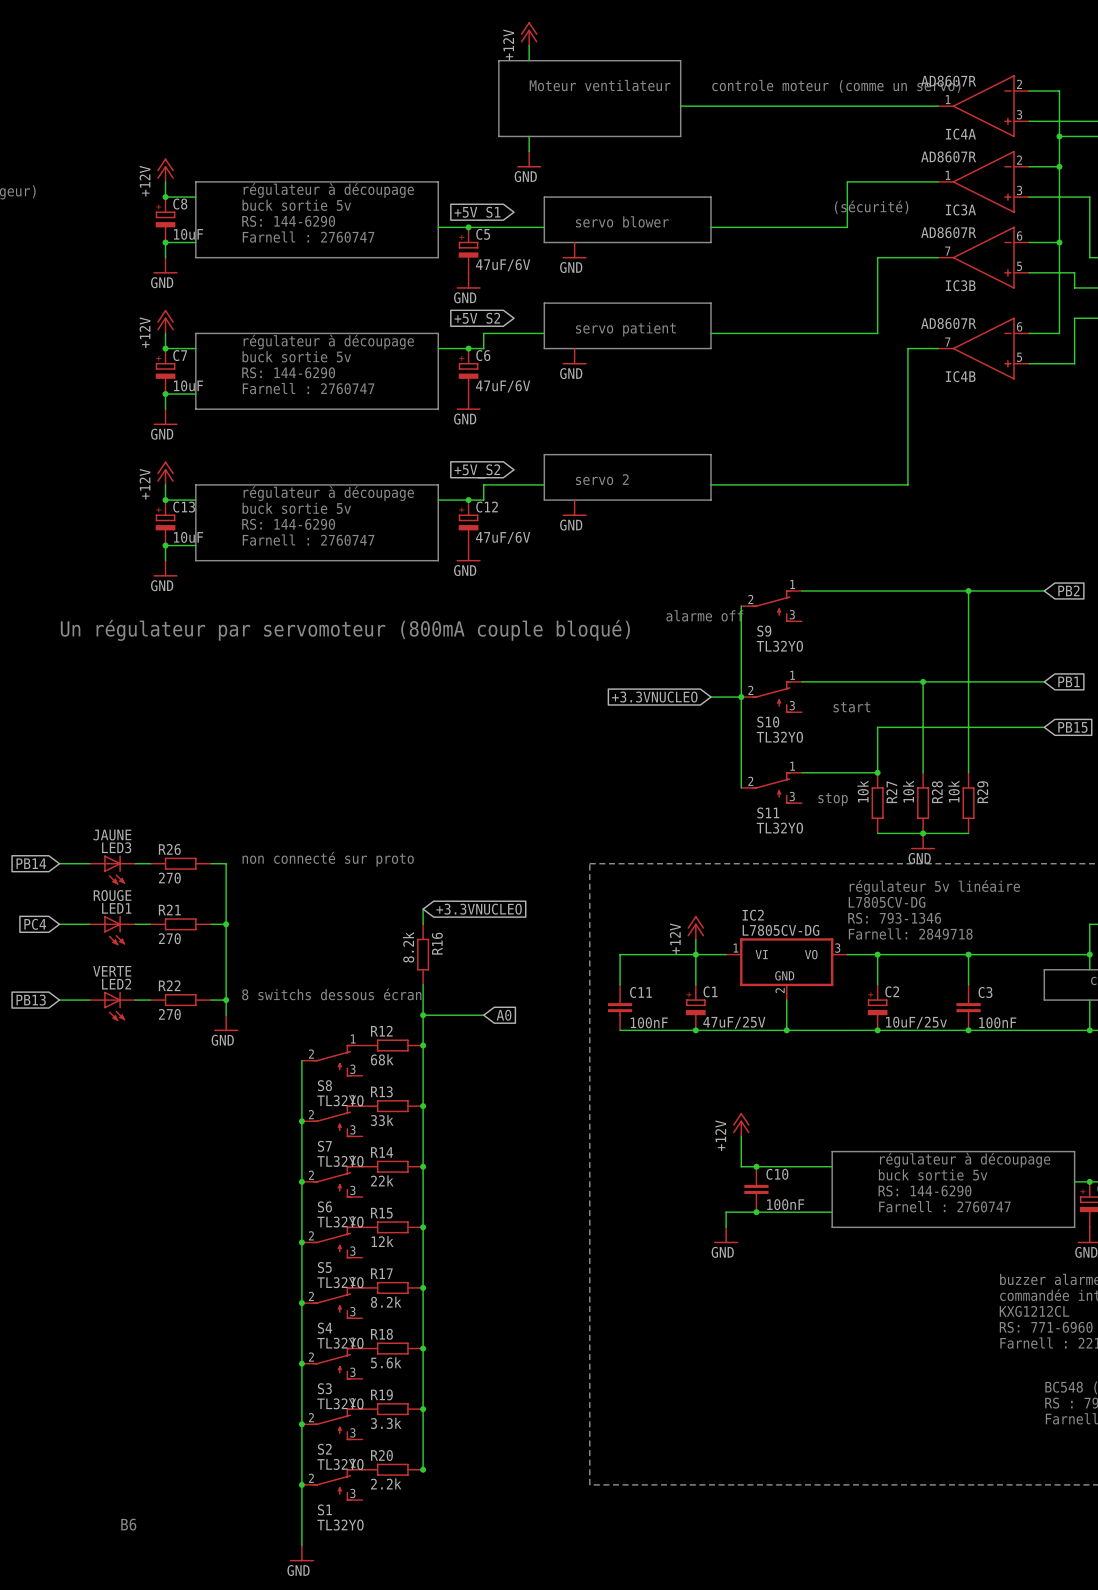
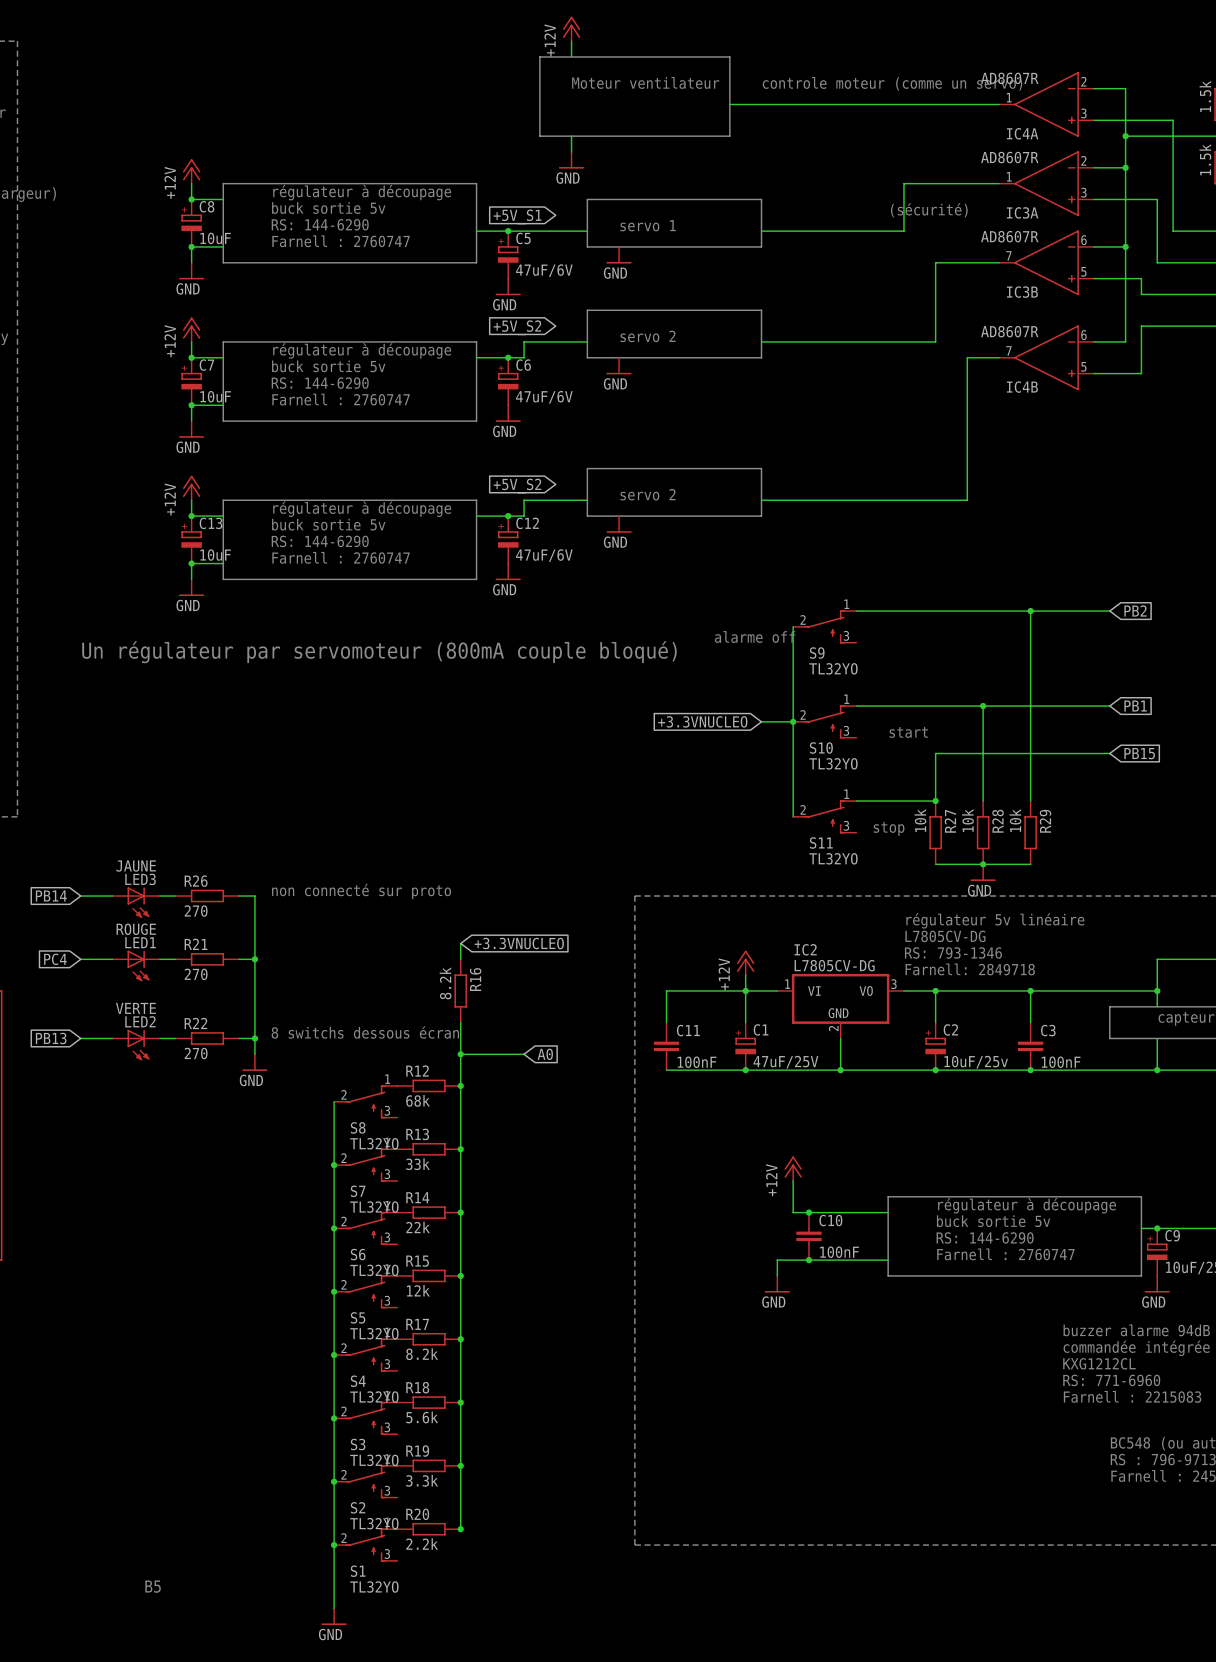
text: servo blower (622, 221) -> servo 1 (648, 225)
text: servo patient (625, 329) -> servo 2 (647, 336)
text: B6 (128, 1524) -> B5 (153, 1586)

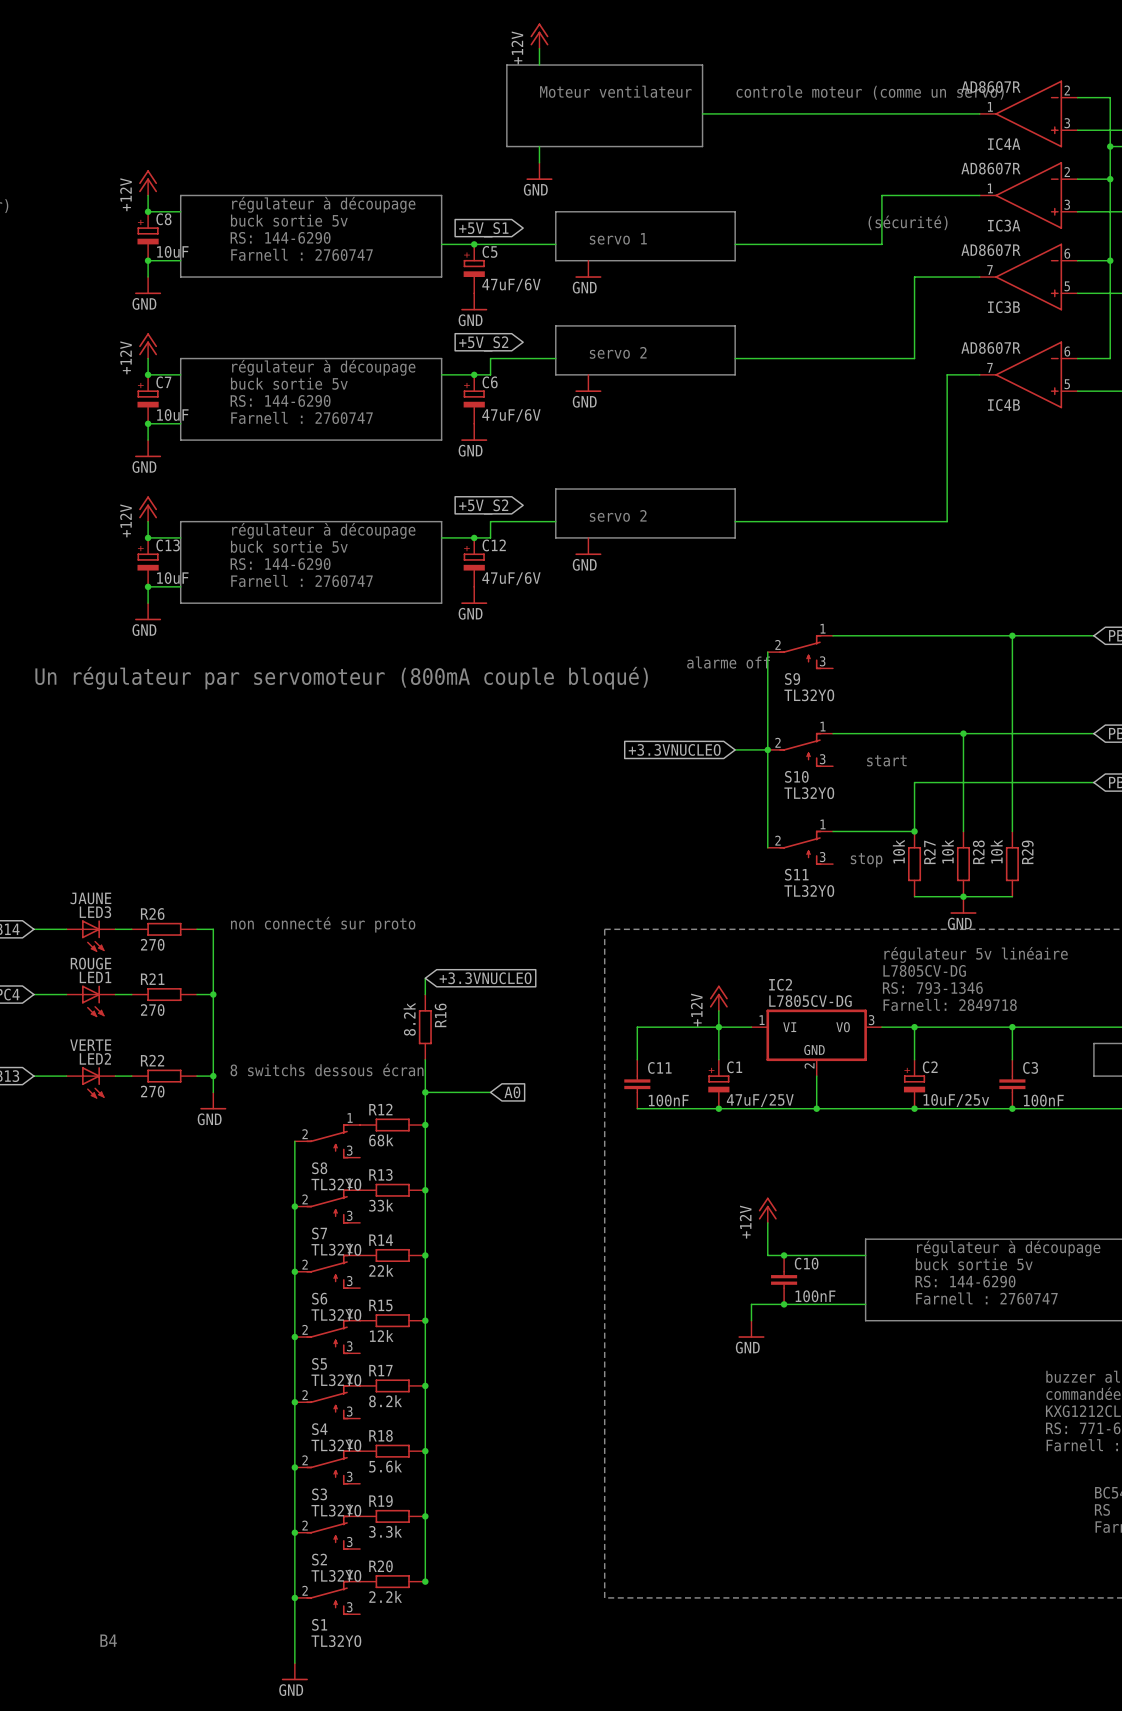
text: B5 (153, 1586) -> B4 (108, 1640)

